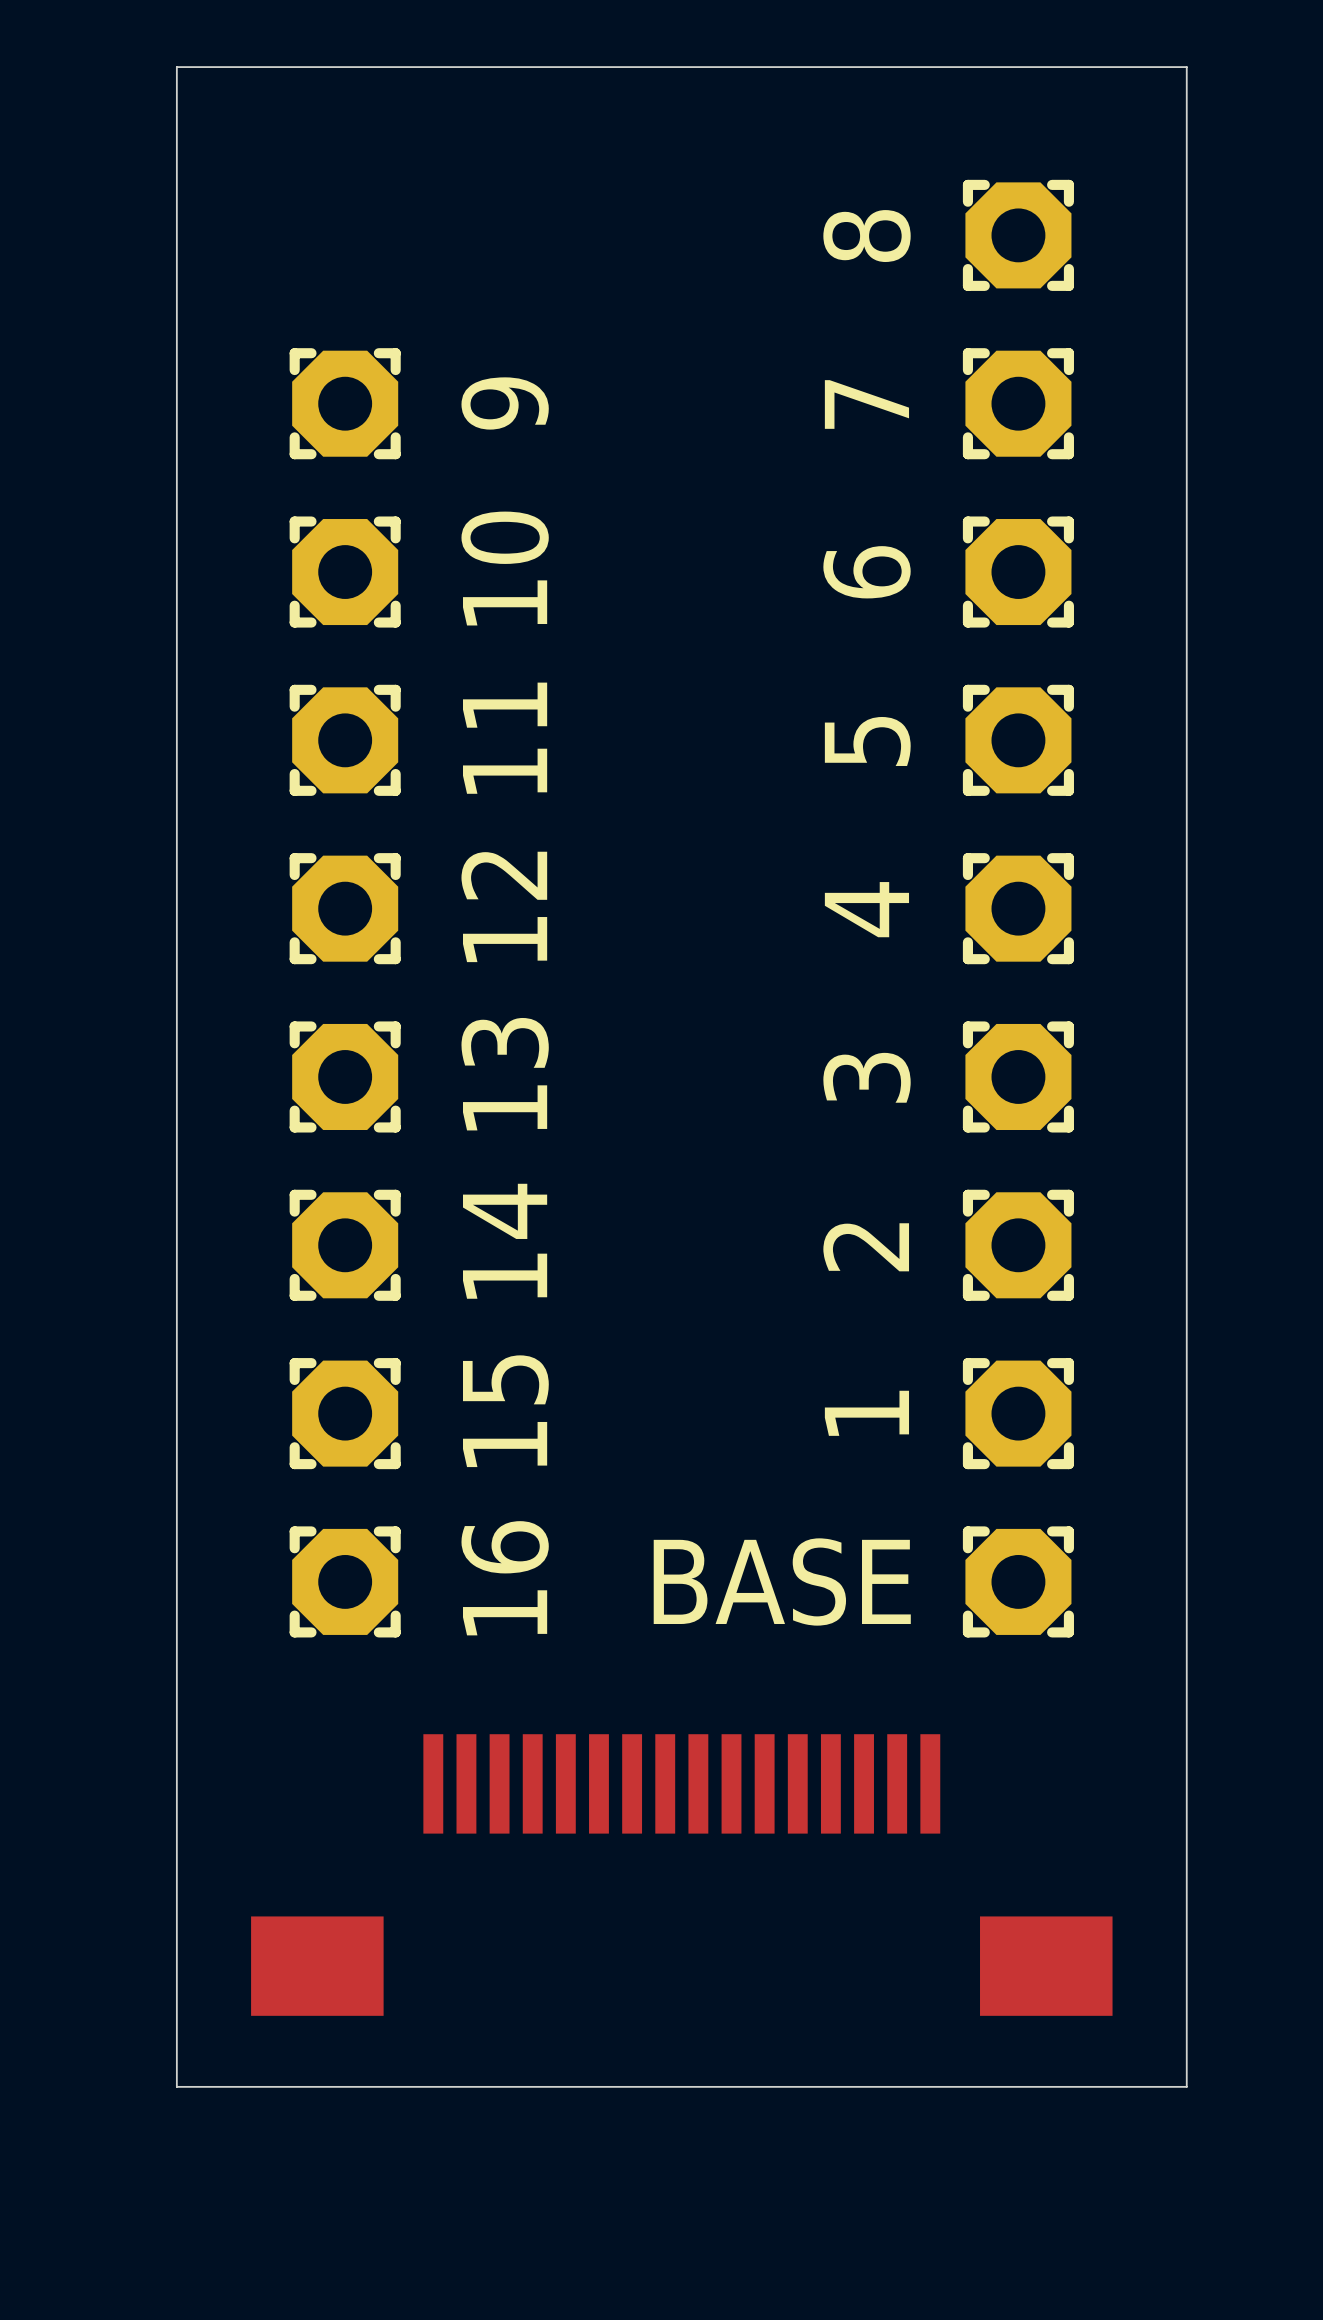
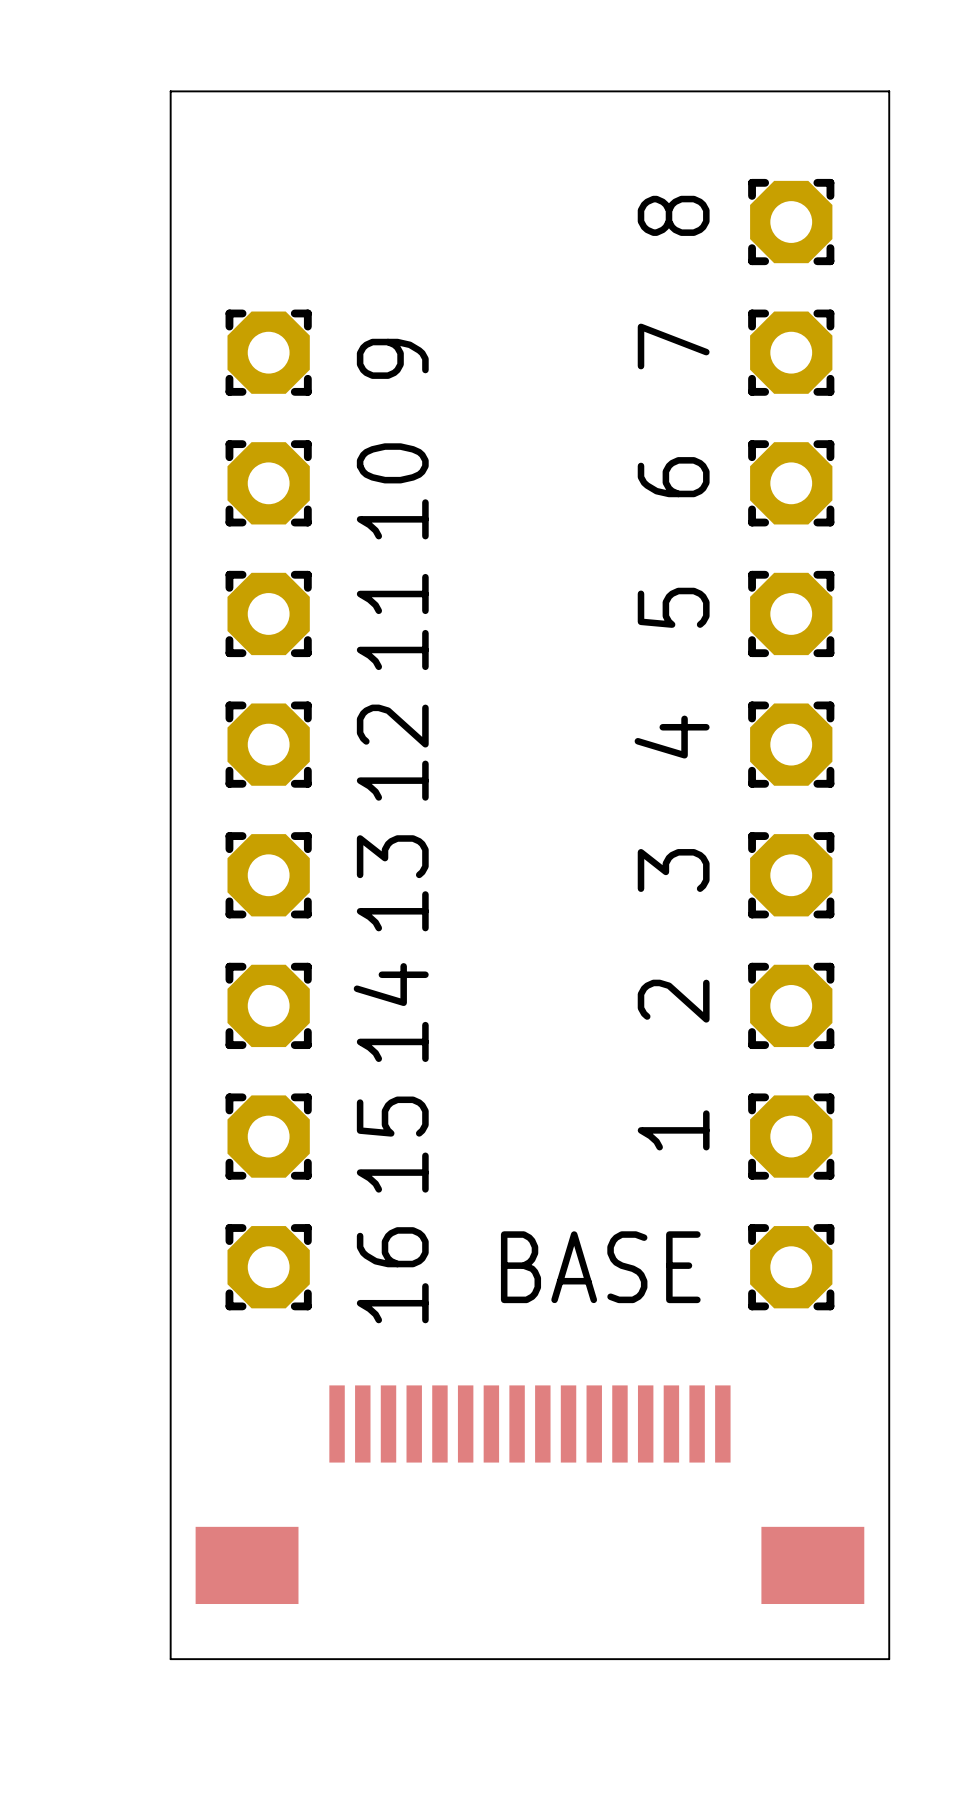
board edge: (218, 67) (176, 67) (176, 2086) (218, 2086) -> (170, 91) (170, 1659)
board edge: (1144, 67) (1186, 67) (1186, 2086) (1144, 2086) -> (889, 91) (889, 1659)

